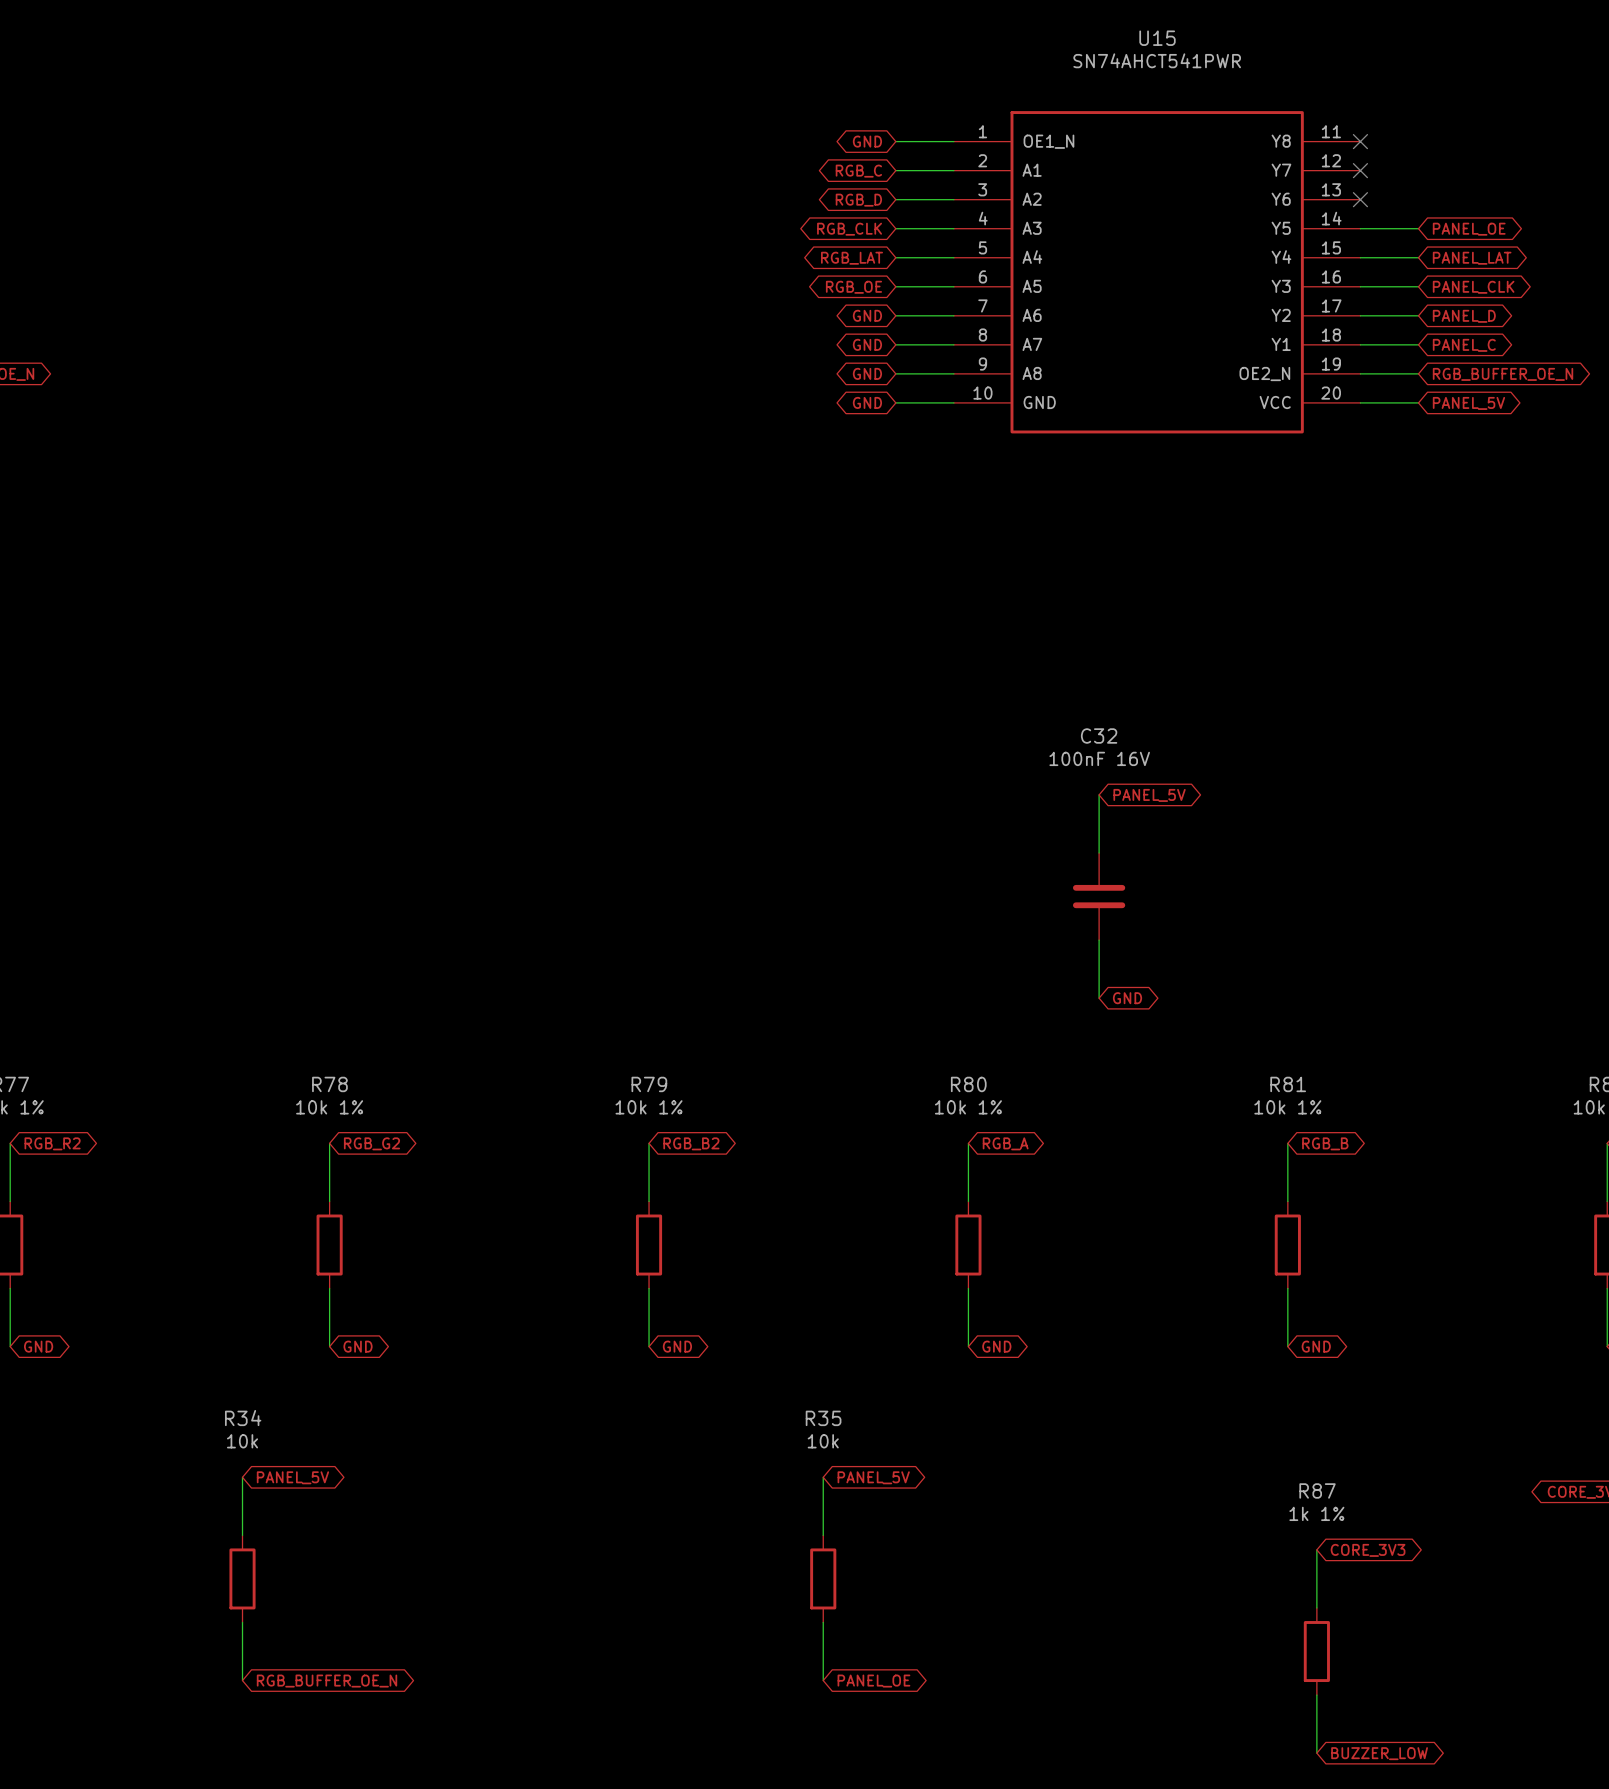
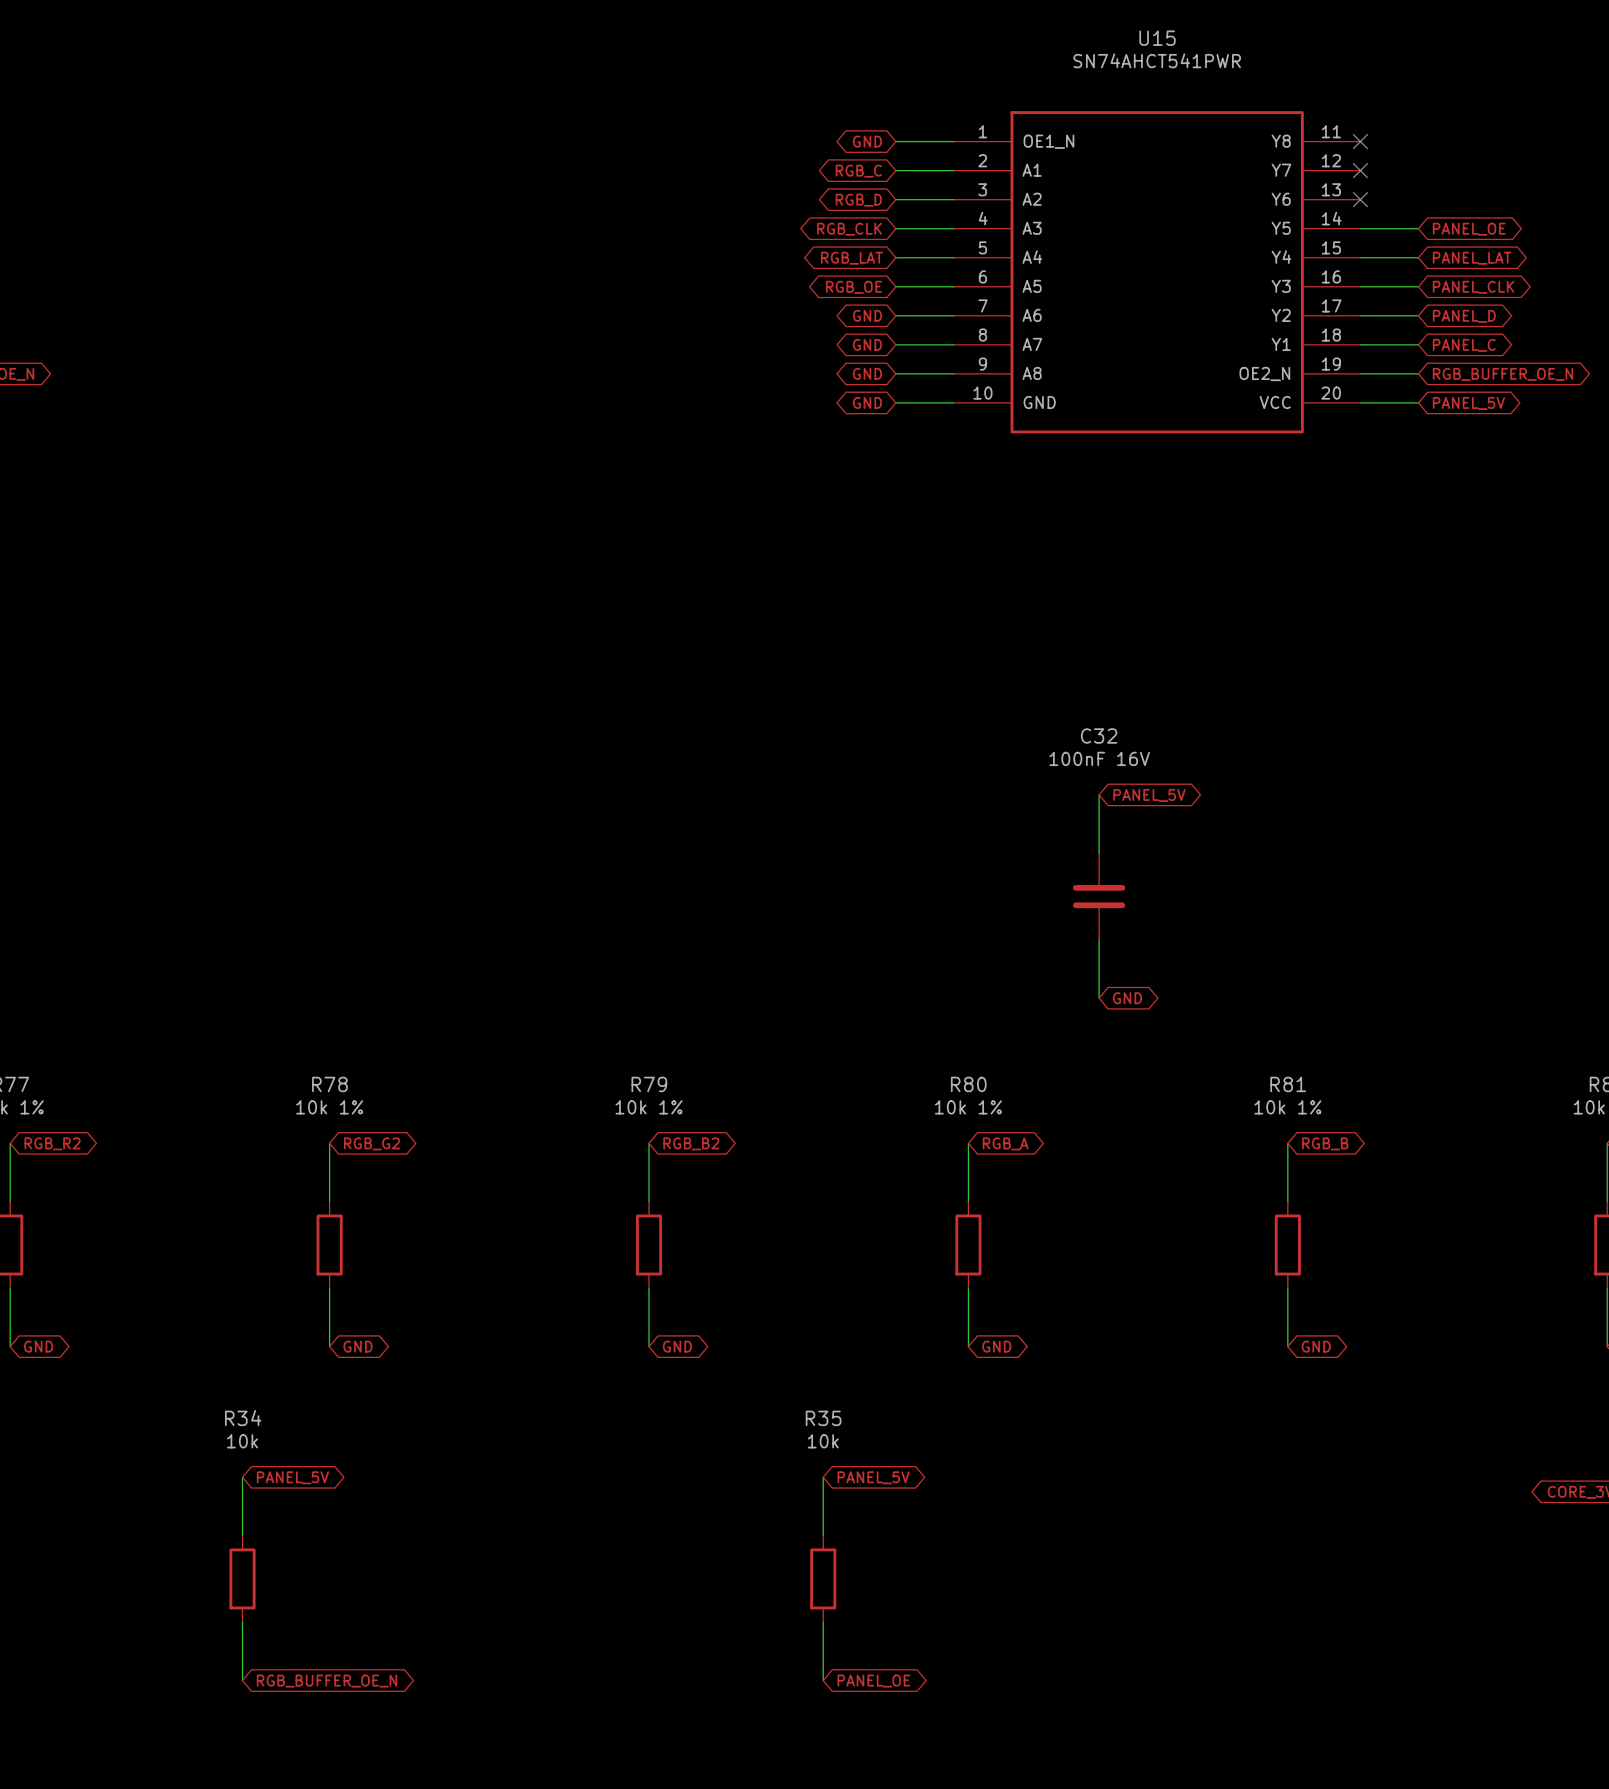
wire: (1316, 1549) (1316, 1607) -> none
global label: CORE_3V3 (1368, 1550) -> none
R87: 1k 1% (1316, 1651) -> none
wire: (1316, 1695) (1316, 1753) -> none
global label: BUZZER_LOW (1379, 1753) -> none

